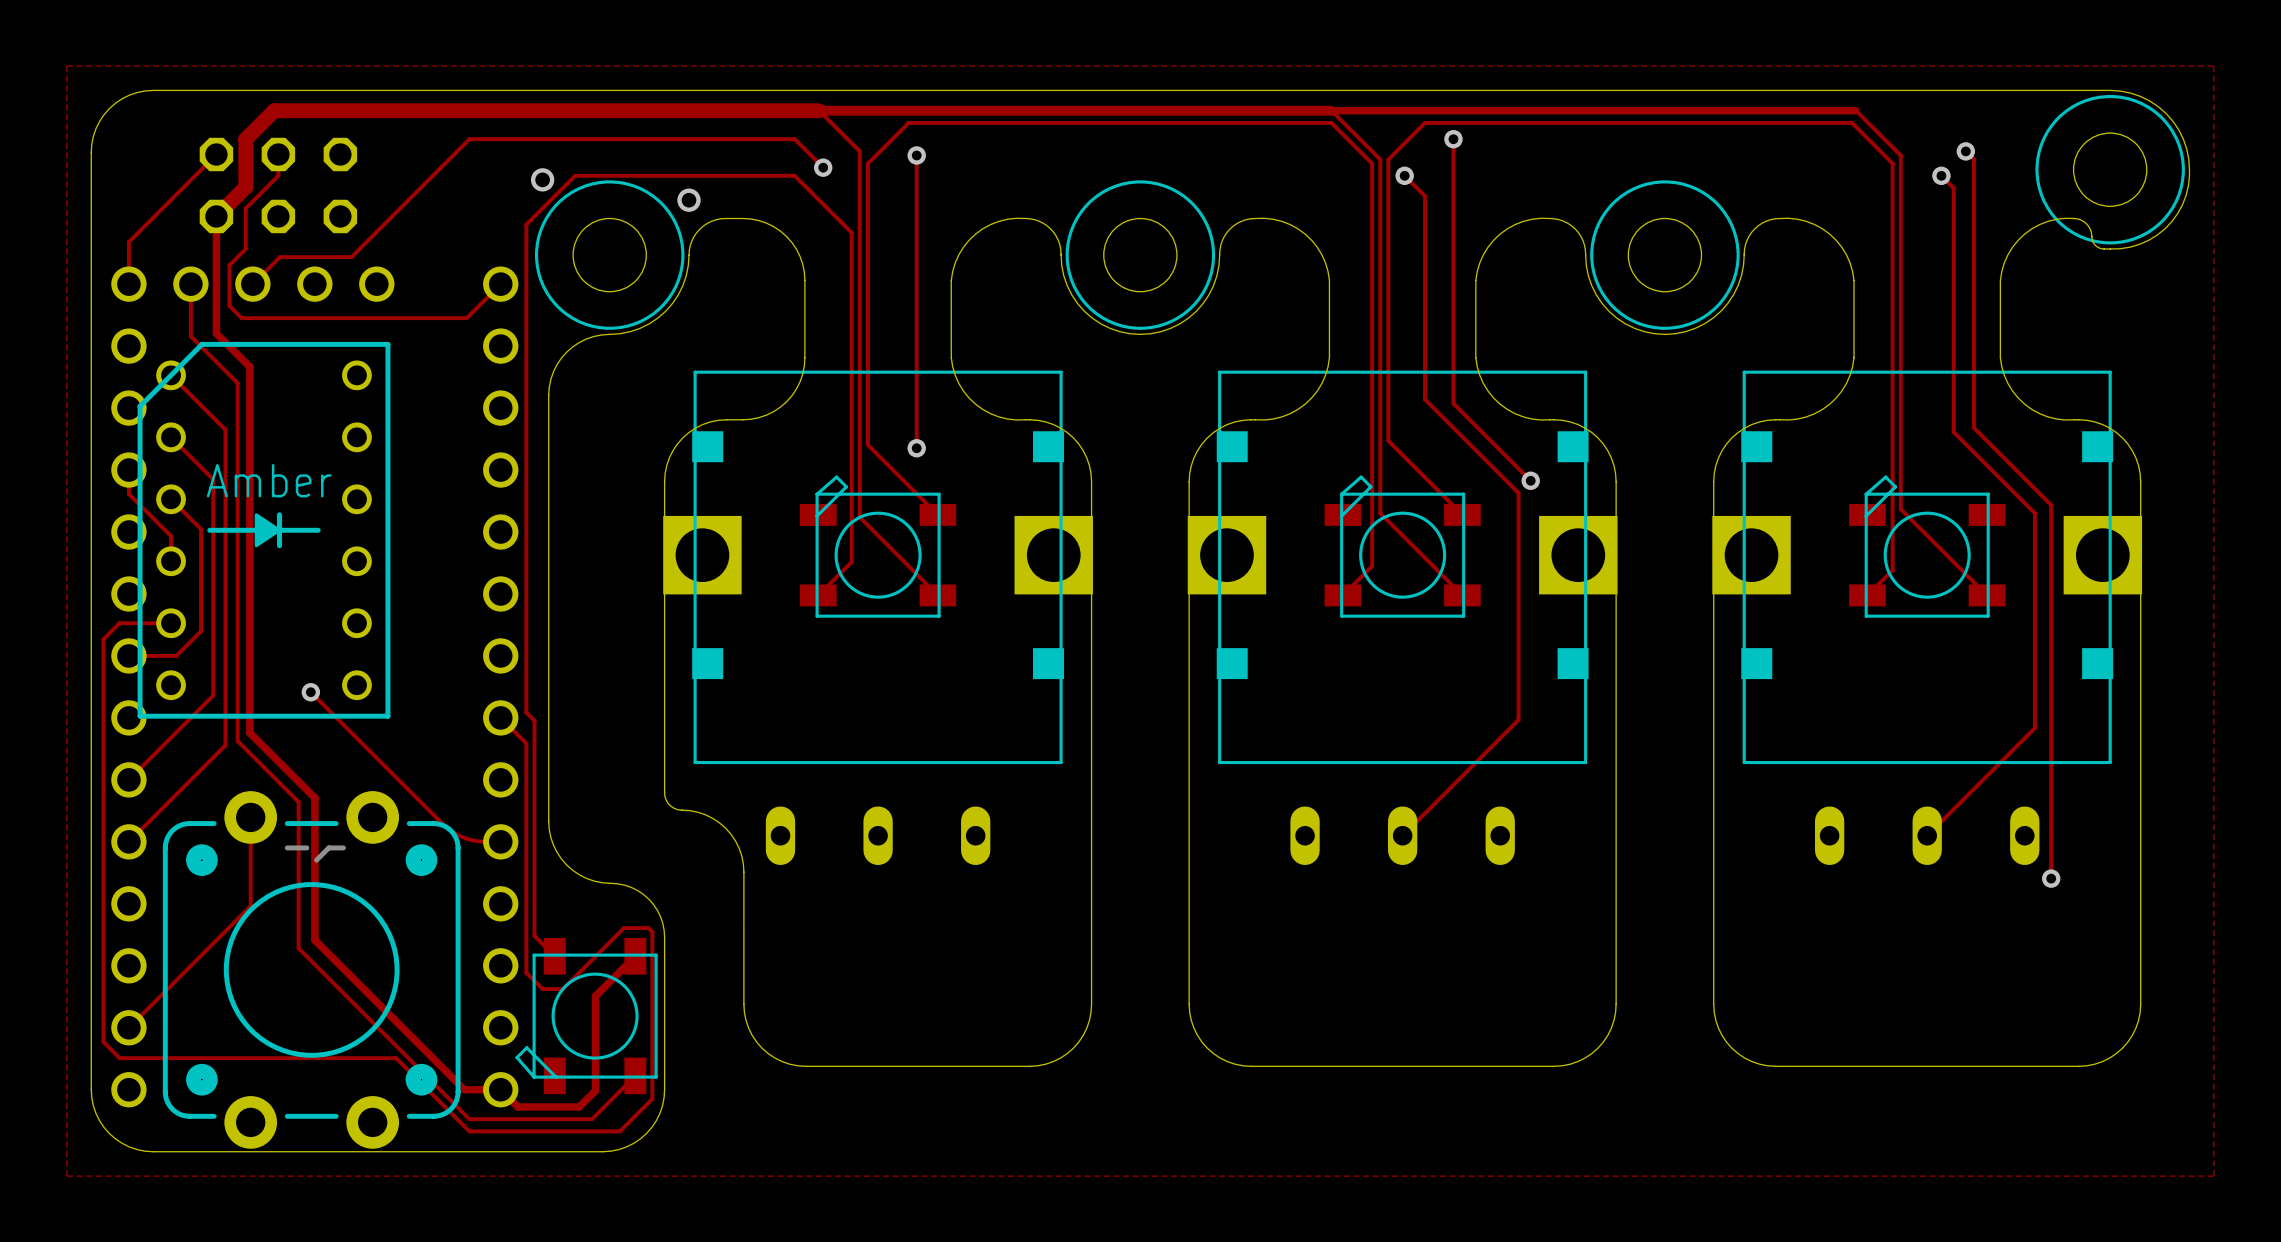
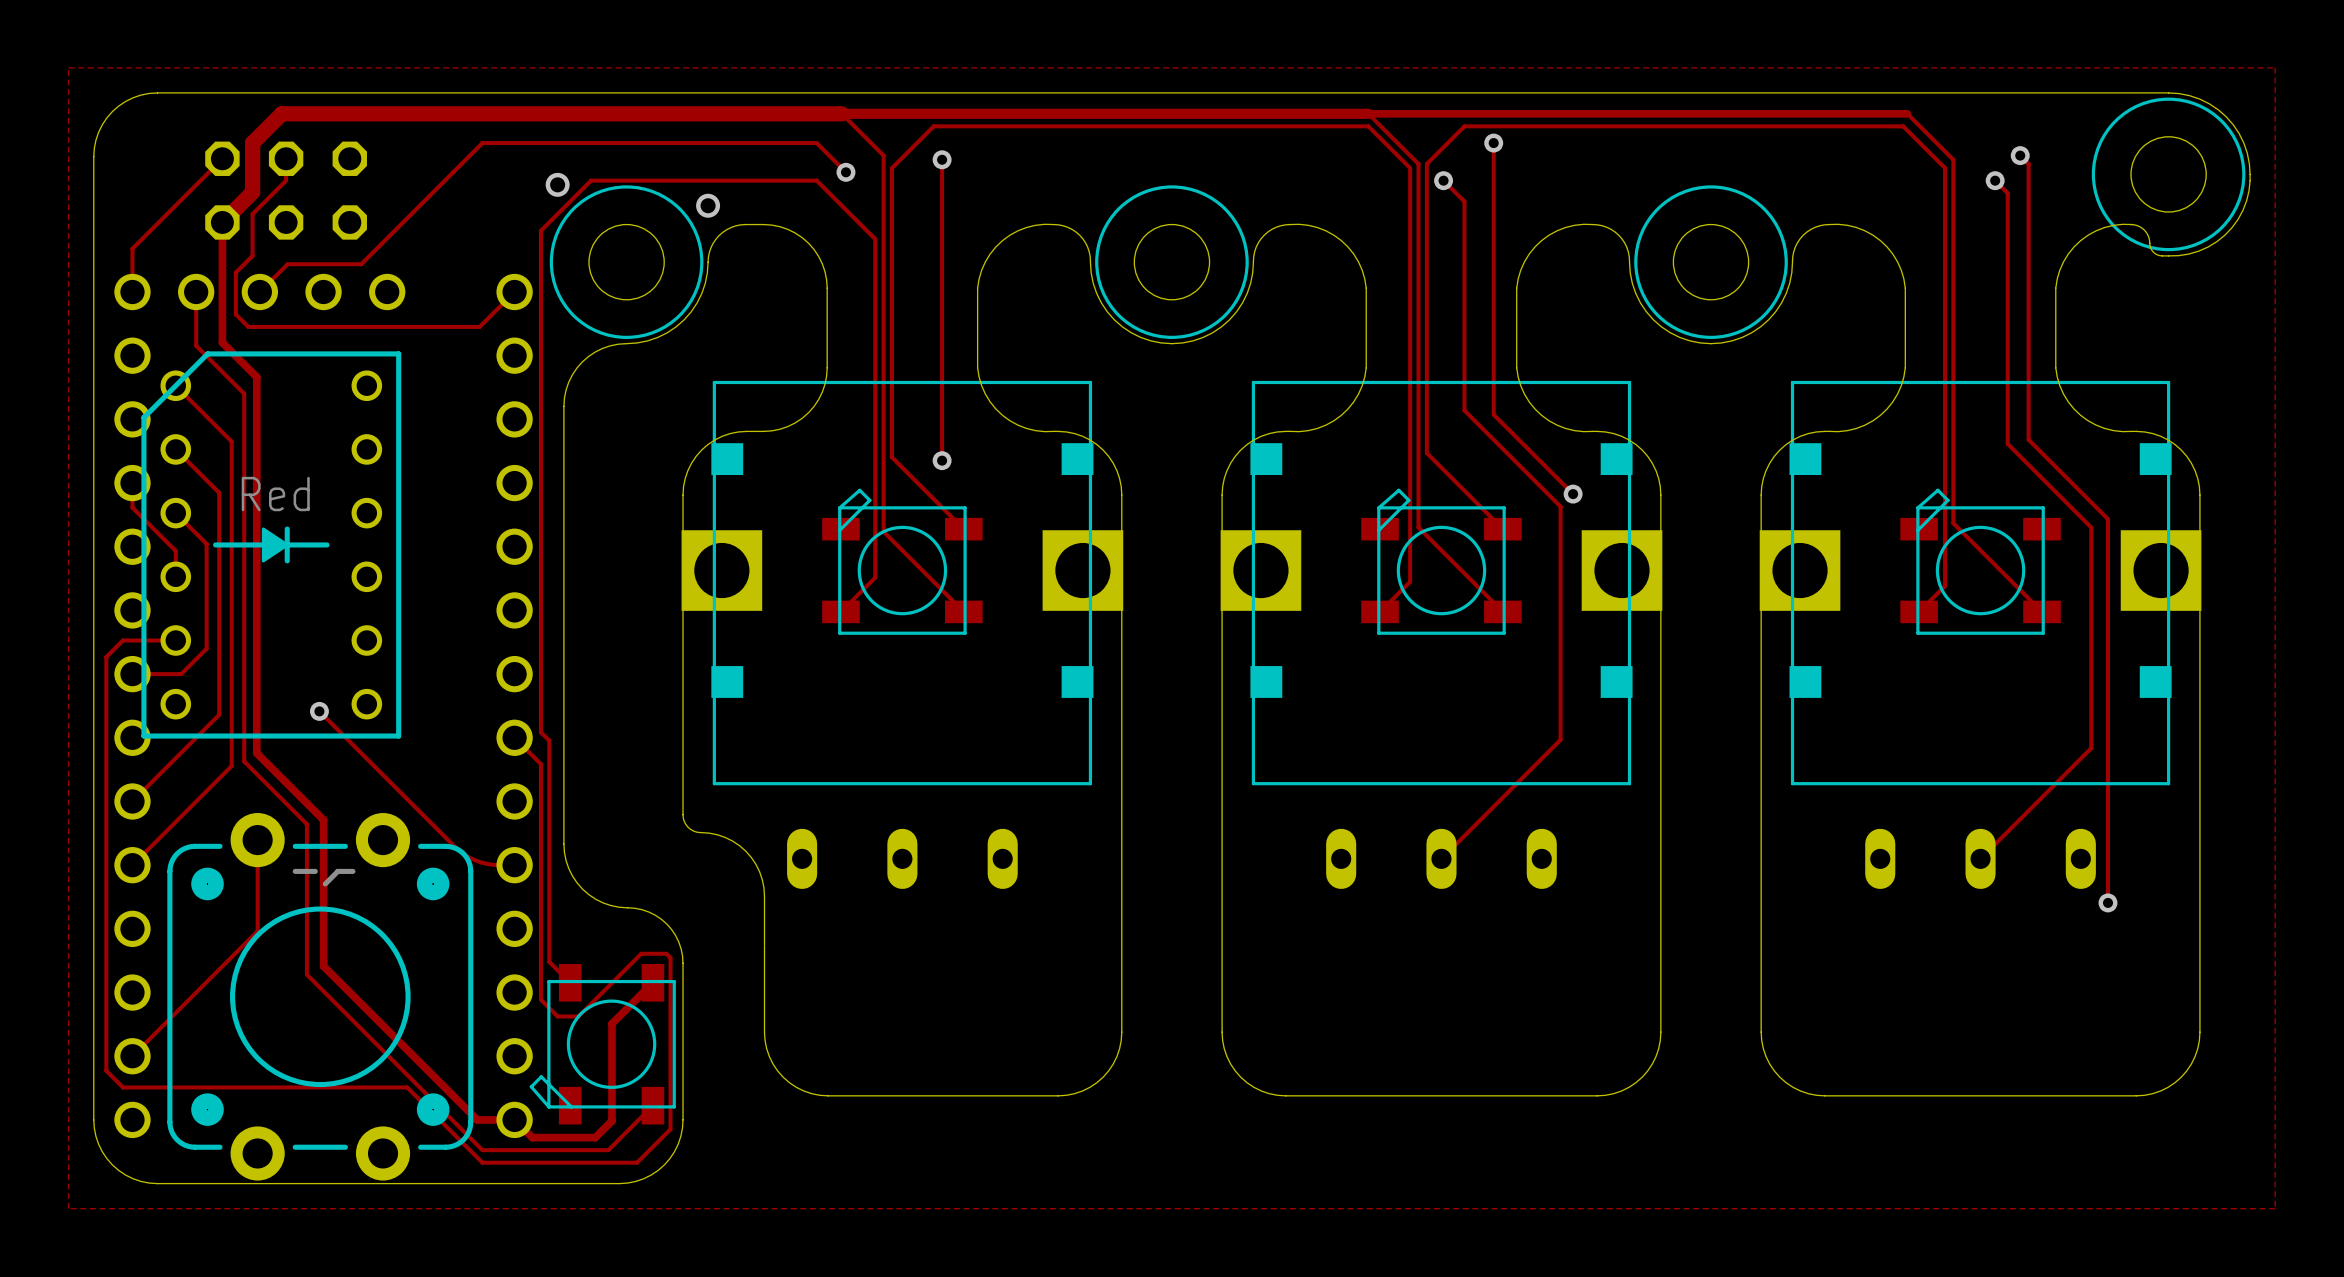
part value: Amber (269, 480) -> Red (275, 494)

